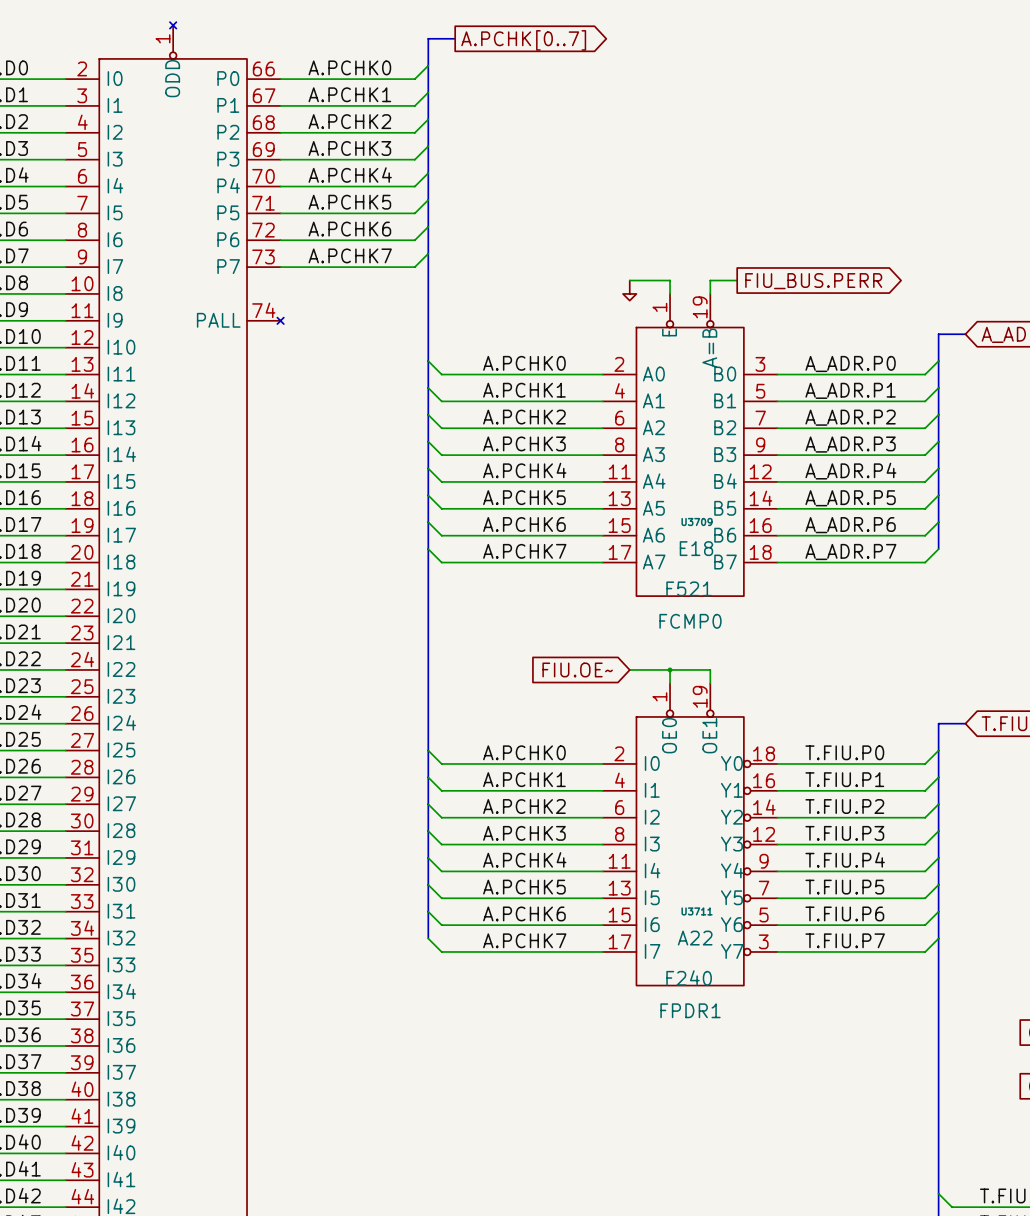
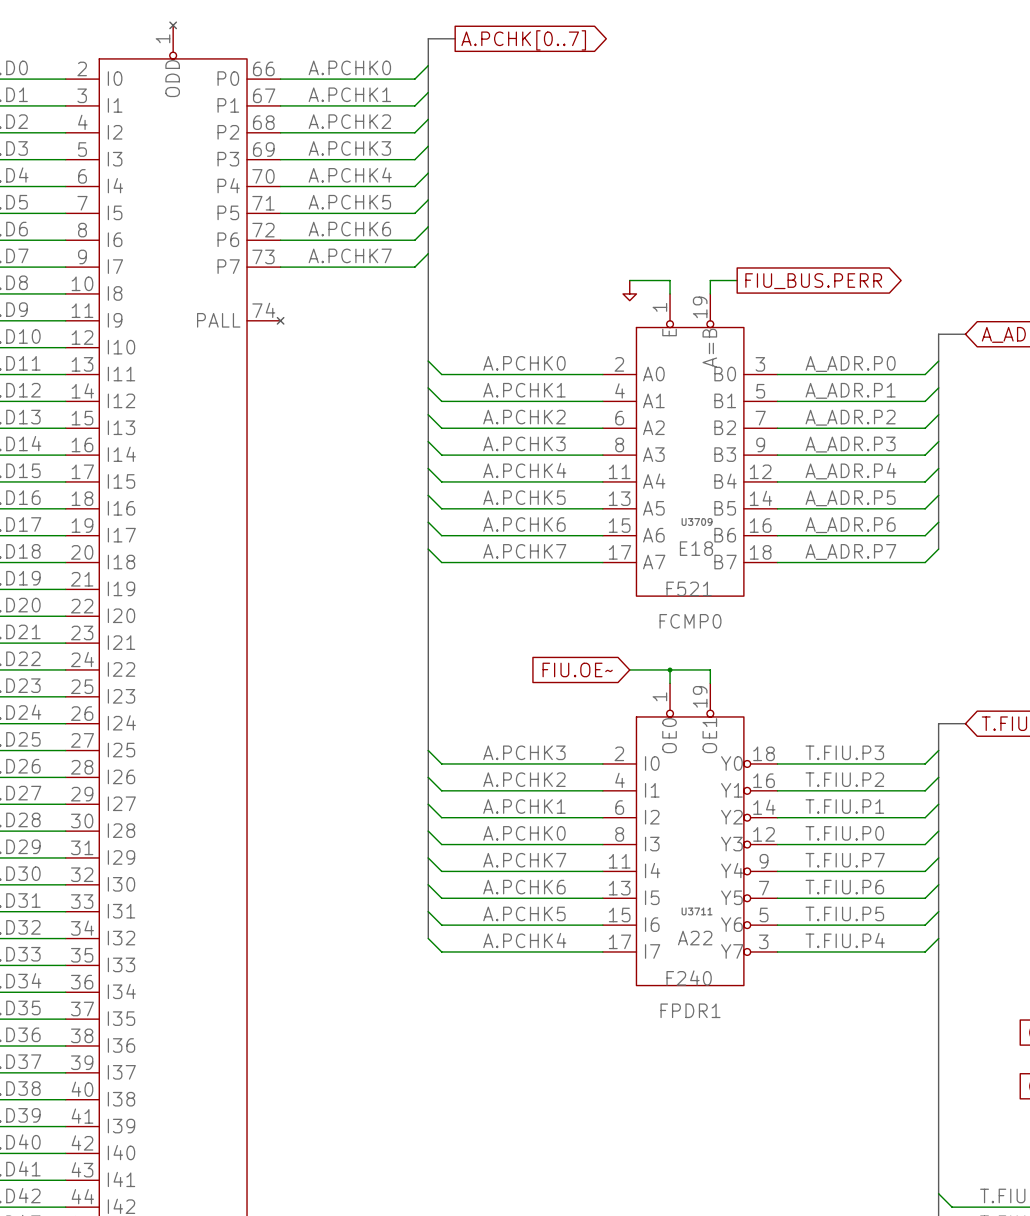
label: A.PCHK0 (524, 752) -> A.PCHK3 (524, 752)
label: T.FIU.P0 (844, 752) -> T.FIU.P3 (844, 752)
label: A.PCHK1 (524, 779) -> A.PCHK2 (524, 779)
label: T.FIU.P1 (844, 779) -> T.FIU.P2 (844, 779)
label: A.PCHK2 (524, 806) -> A.PCHK1 (524, 806)
label: T.FIU.P2 (844, 806) -> T.FIU.P1 (844, 806)
label: A.PCHK3 (524, 833) -> A.PCHK0 (524, 833)
label: T.FIU.P3 (844, 833) -> T.FIU.P0 (844, 833)
label: A.PCHK4 (524, 859) -> A.PCHK7 (524, 860)
label: T.FIU.P4 (845, 859) -> T.FIU.P7 (845, 860)
label: A.PCHK5 (524, 887) -> A.PCHK6 (524, 887)
label: T.FIU.P5 (844, 887) -> T.FIU.P6 (844, 887)
label: A.PCHK6 (524, 913) -> A.PCHK5 (524, 913)
label: T.FIU.P6 (844, 913) -> T.FIU.P5 (844, 913)
label: A.PCHK7 (524, 940) -> A.PCHK4 (524, 940)
label: T.FIU.P7 (845, 940) -> T.FIU.P4 (845, 940)

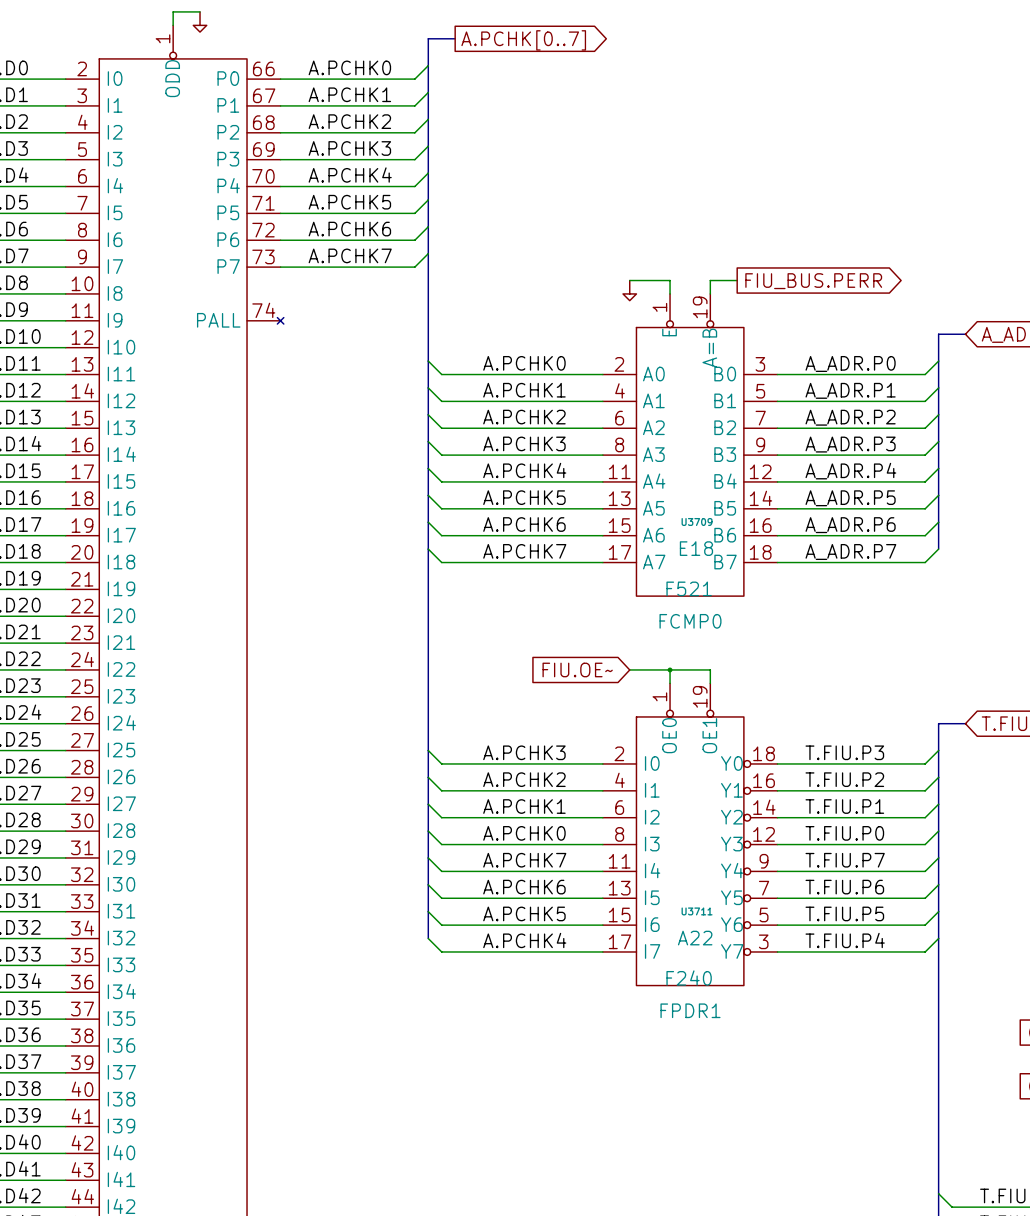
wire: none -> (200, 11) (173, 11) (173, 25)
power symbol: none -> (200, 22)
no-connect mark: (173, 25) -> none

